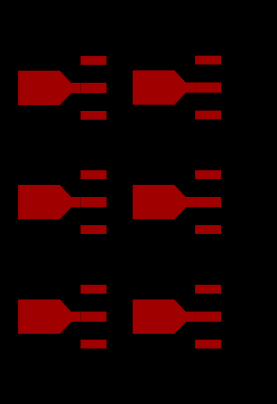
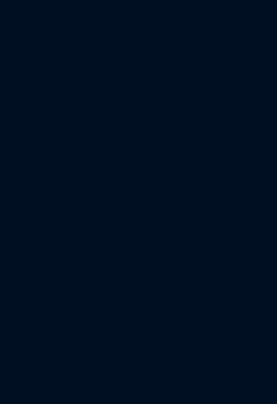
part: (62, 87) -> none
part: (176, 87) -> none
part: (62, 202) -> none
part: (176, 202) -> none
part: (62, 316) -> none
part: (176, 316) -> none

